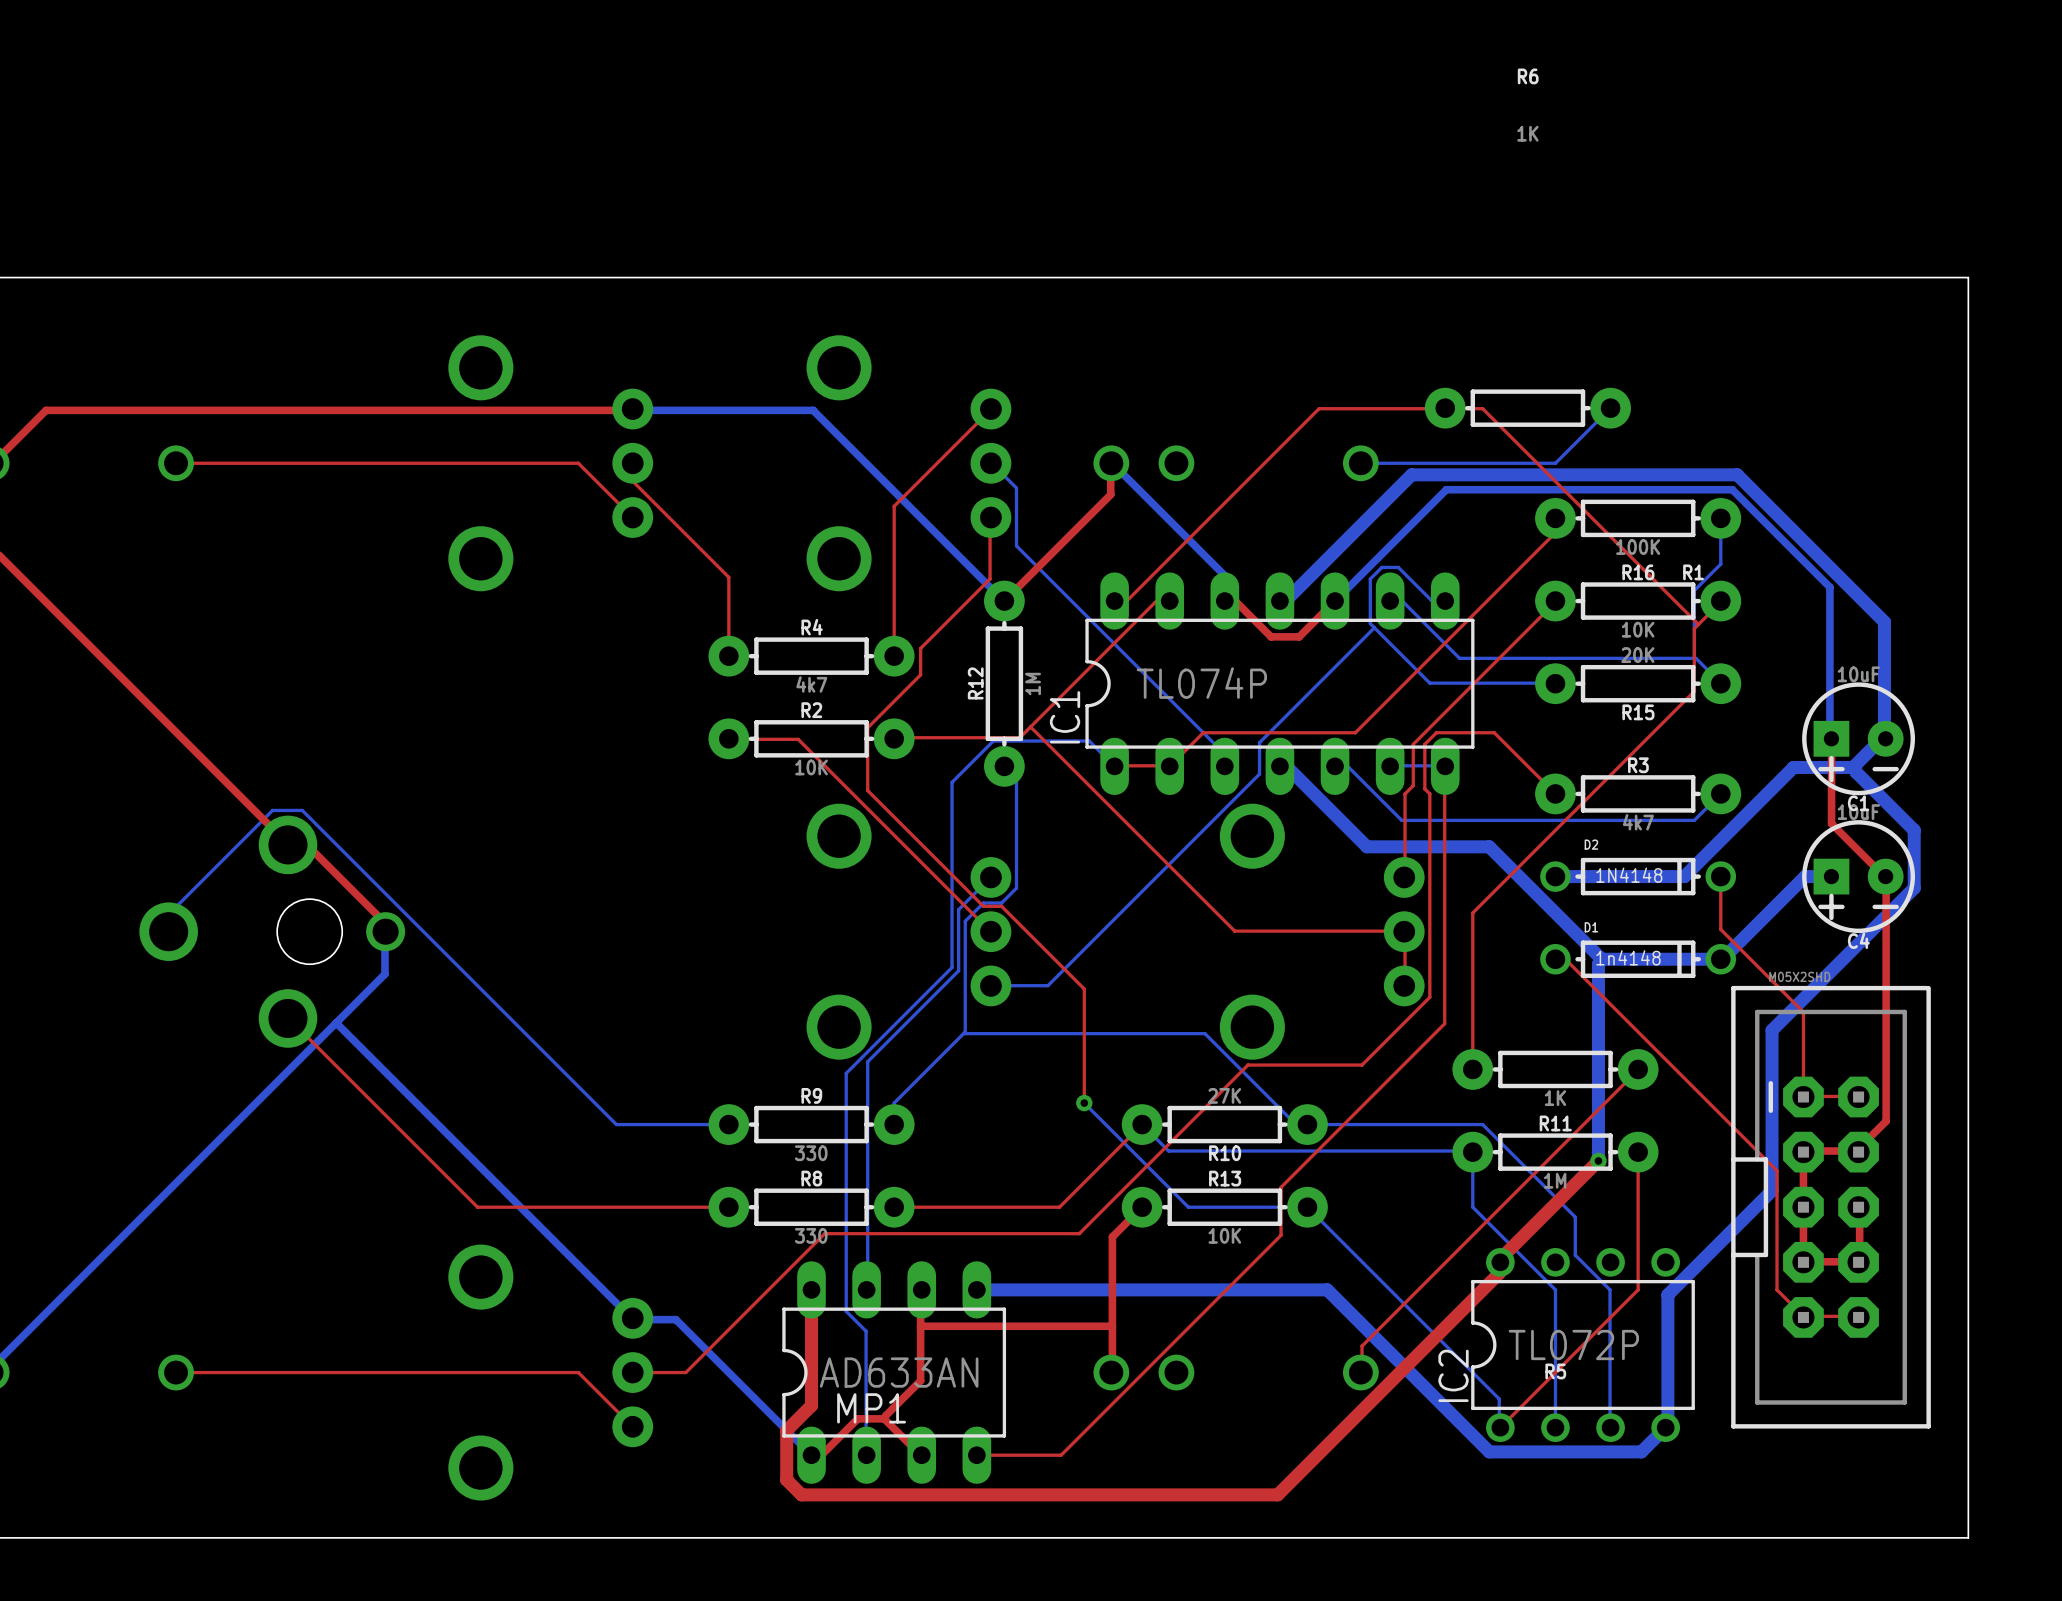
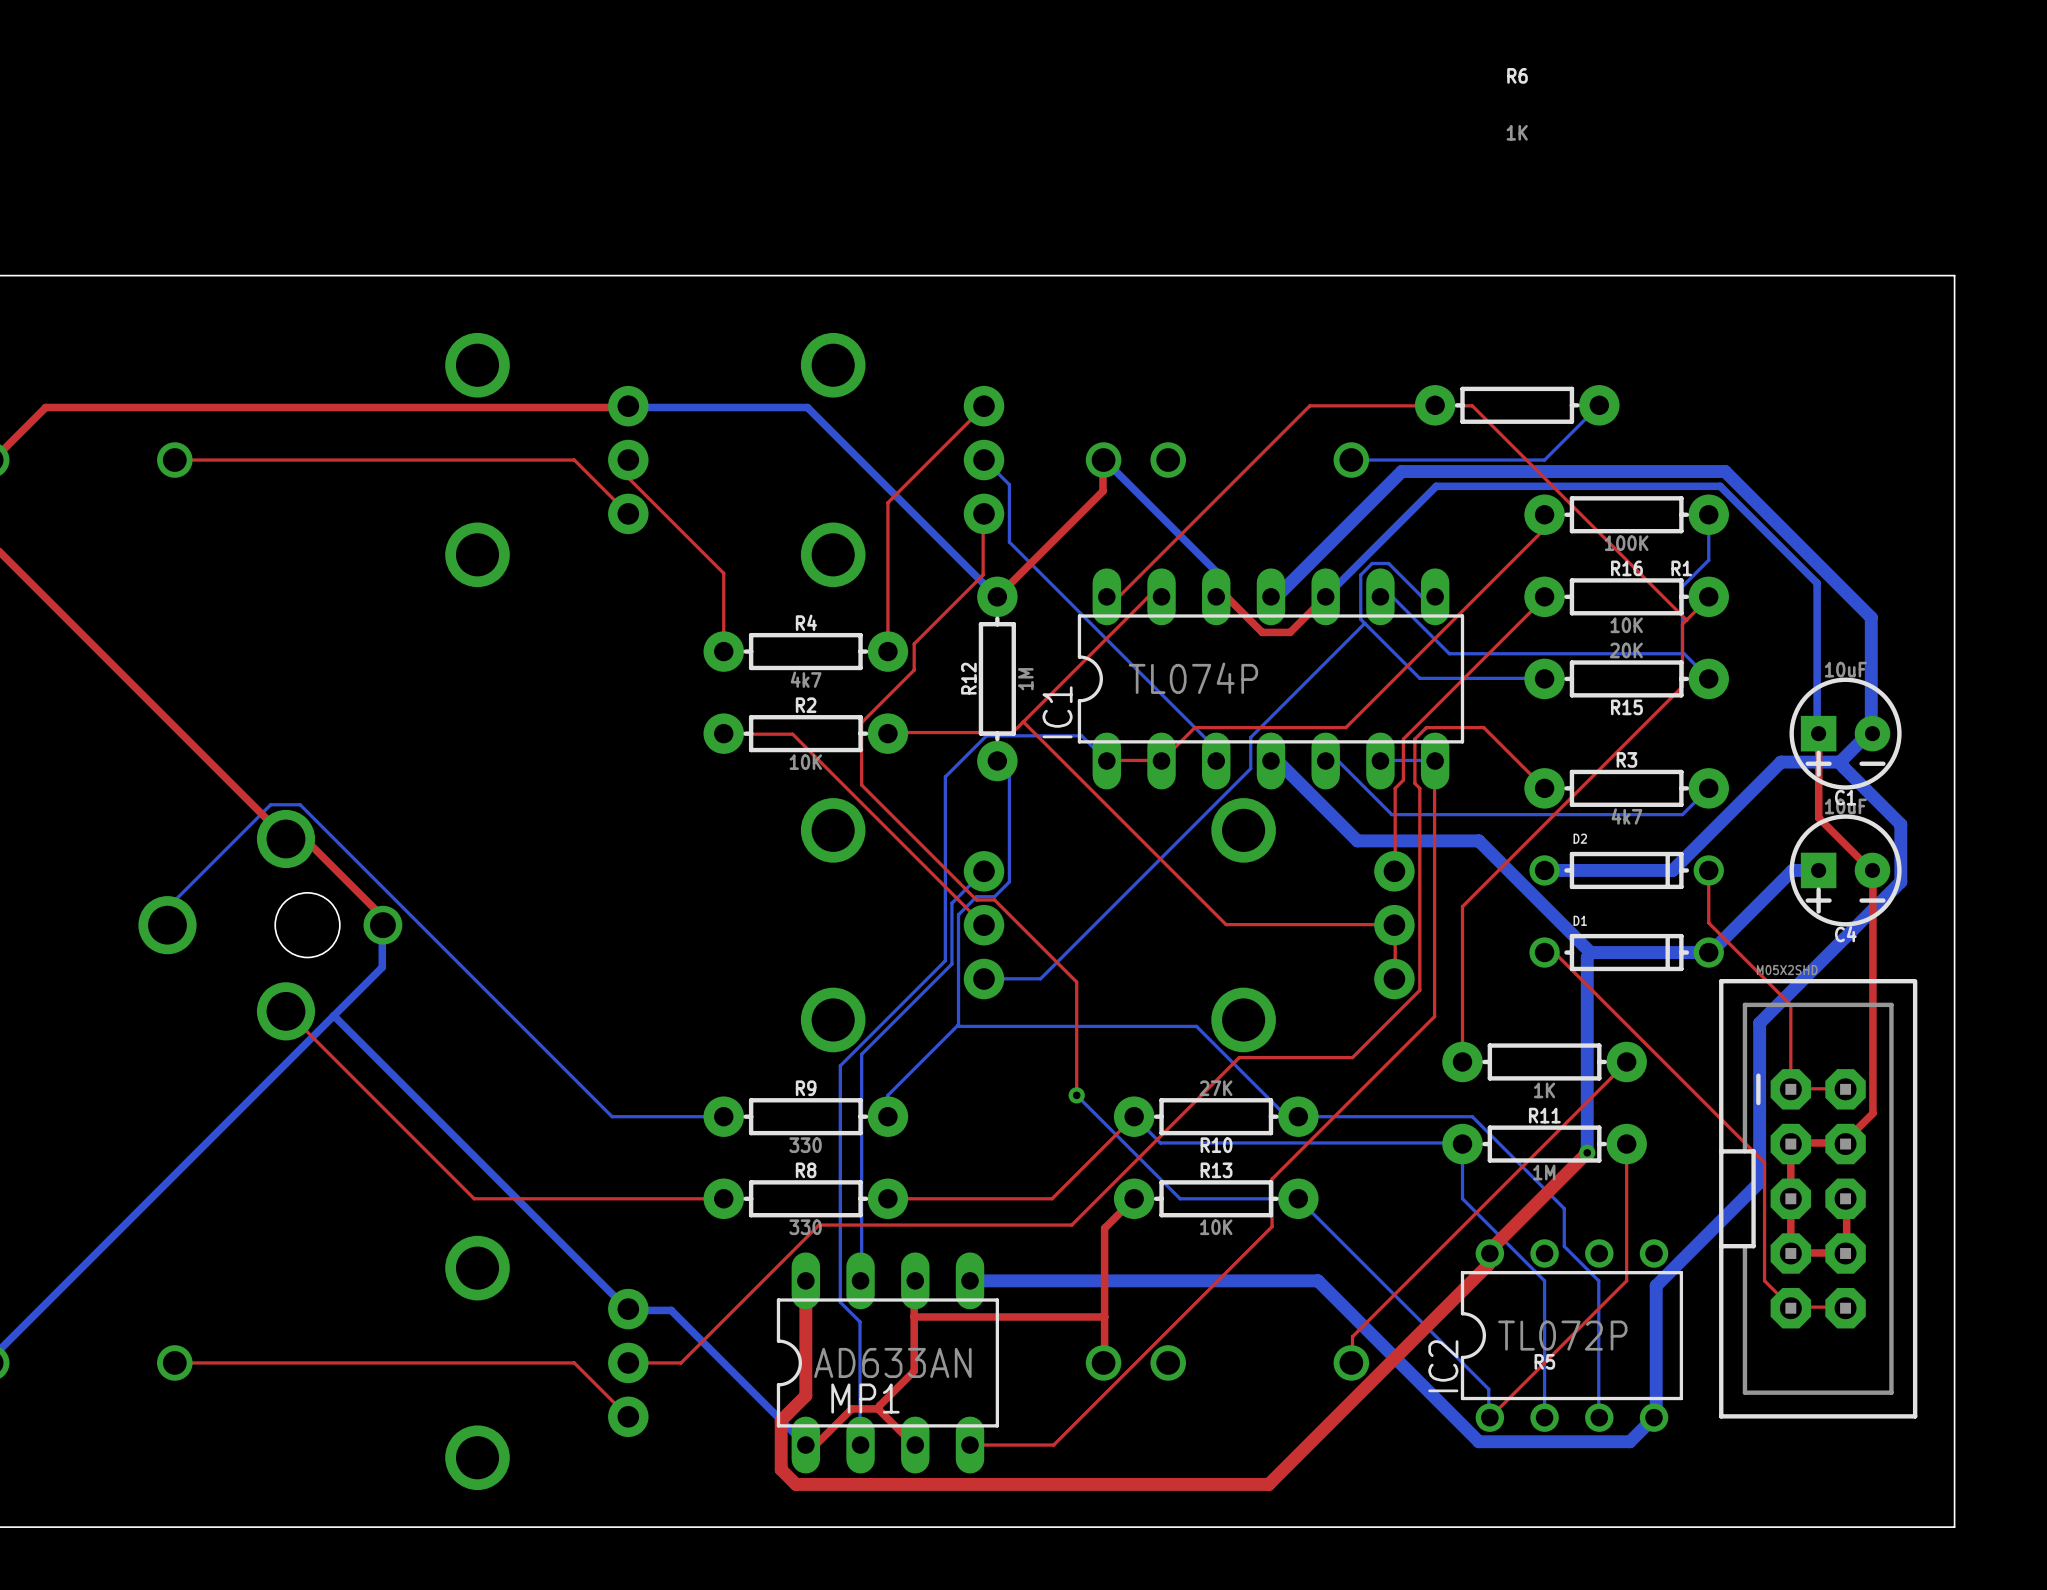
D2 value: 1N4148 (1629, 875) -> none
D1 value: 1n4148 (1628, 957) -> none

